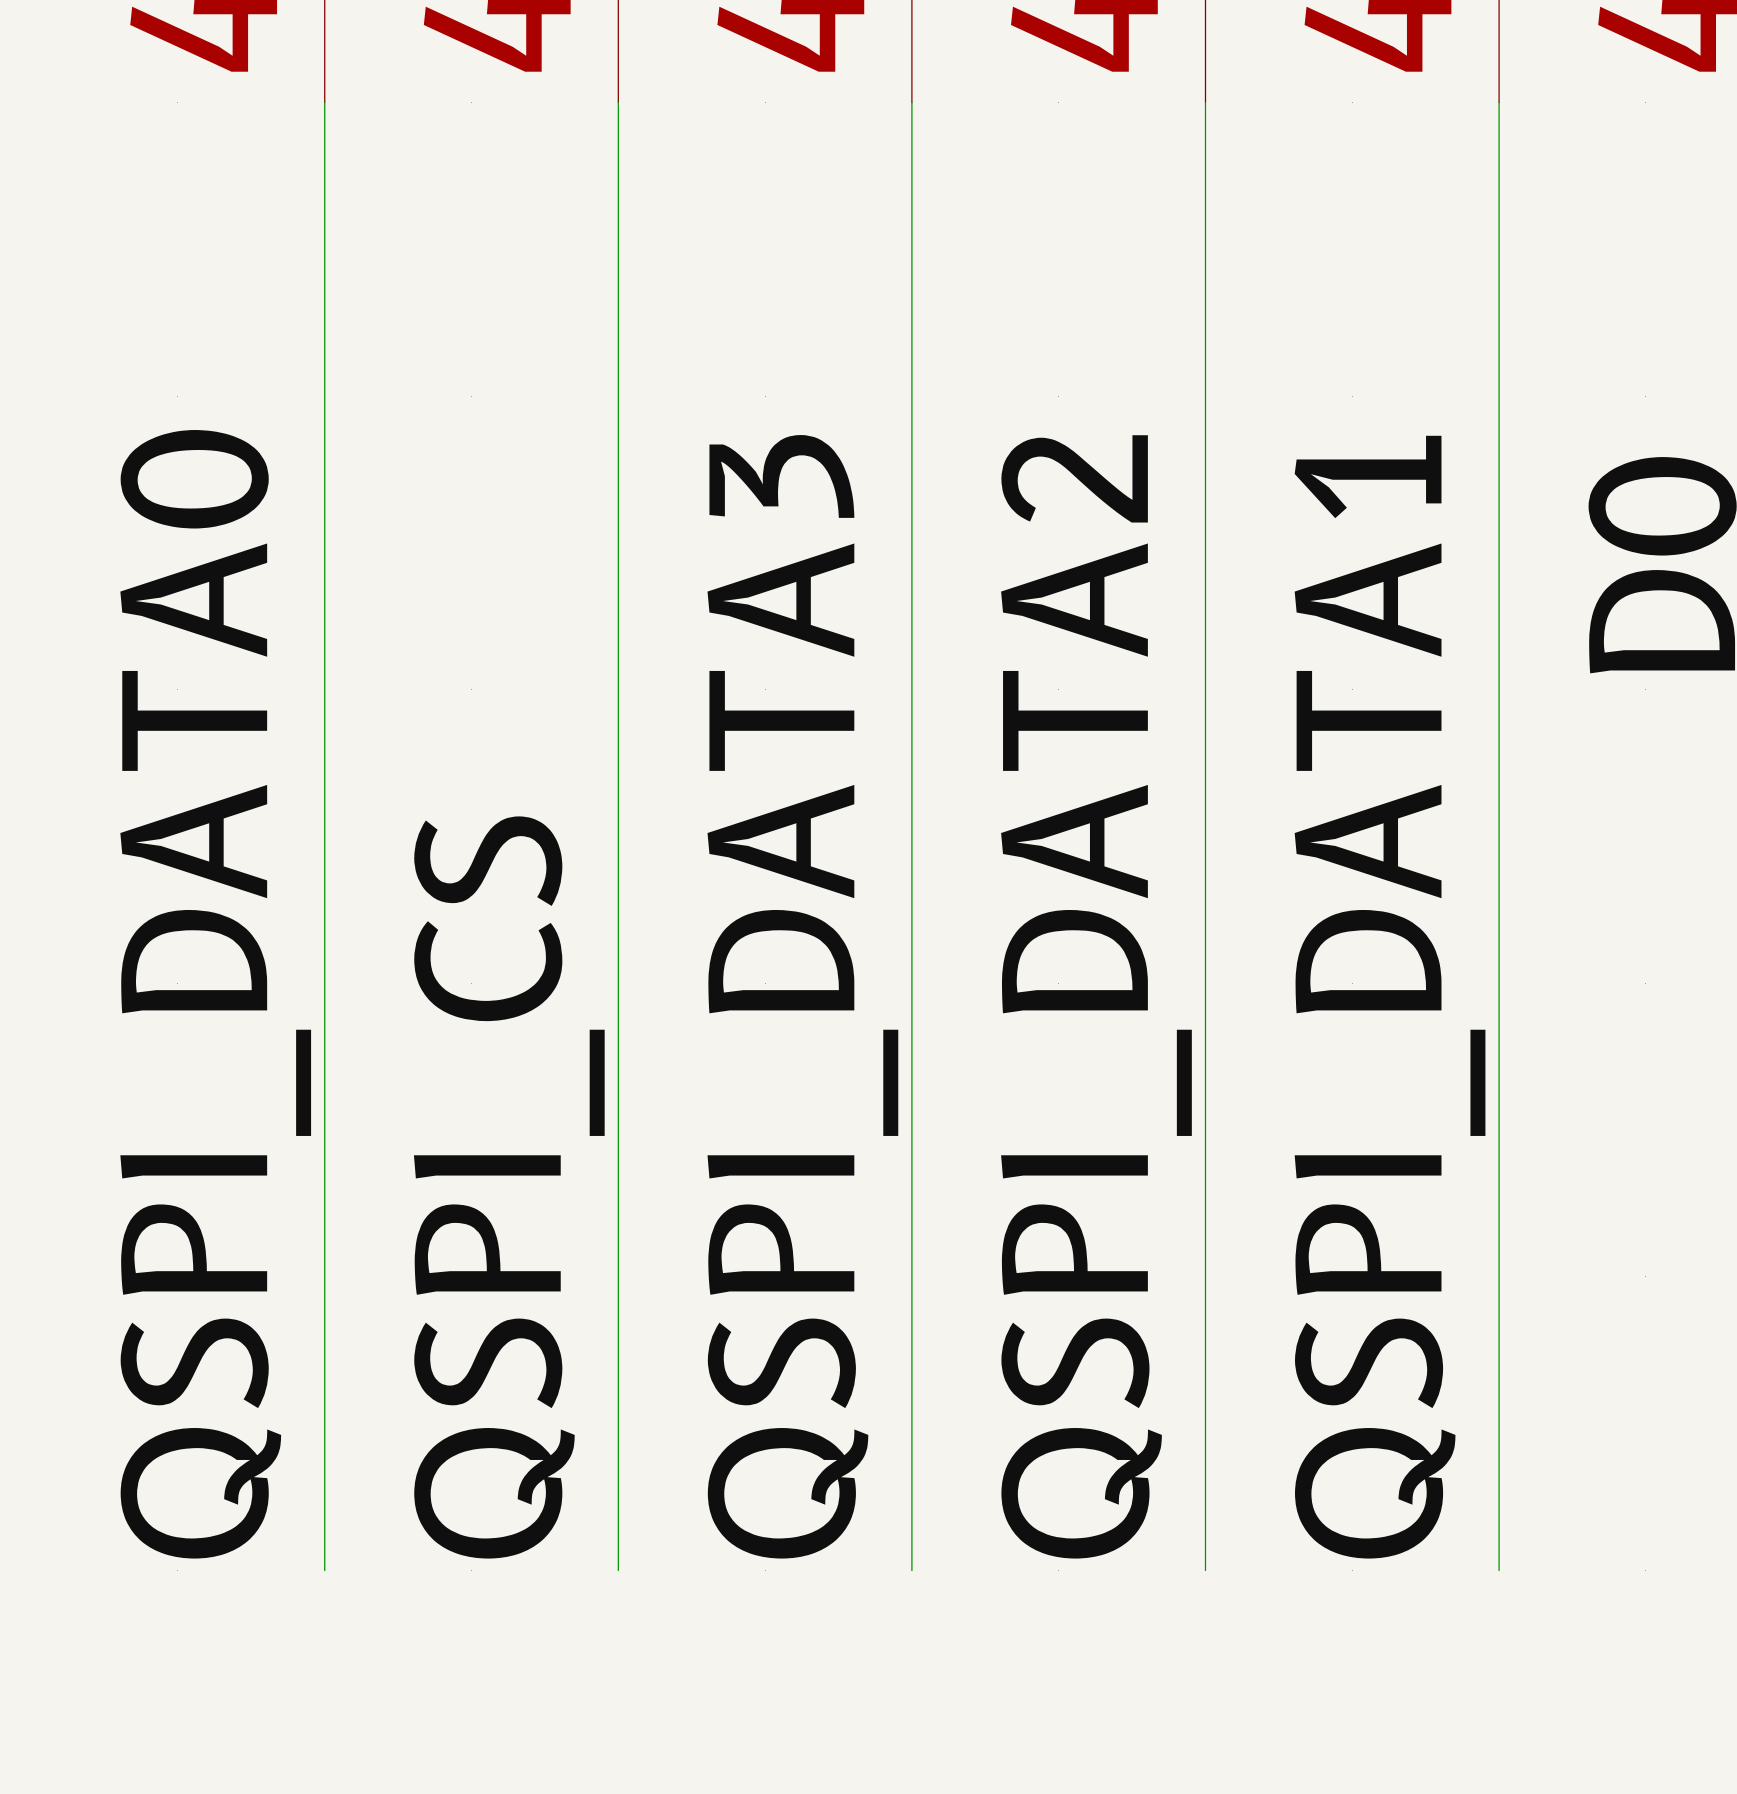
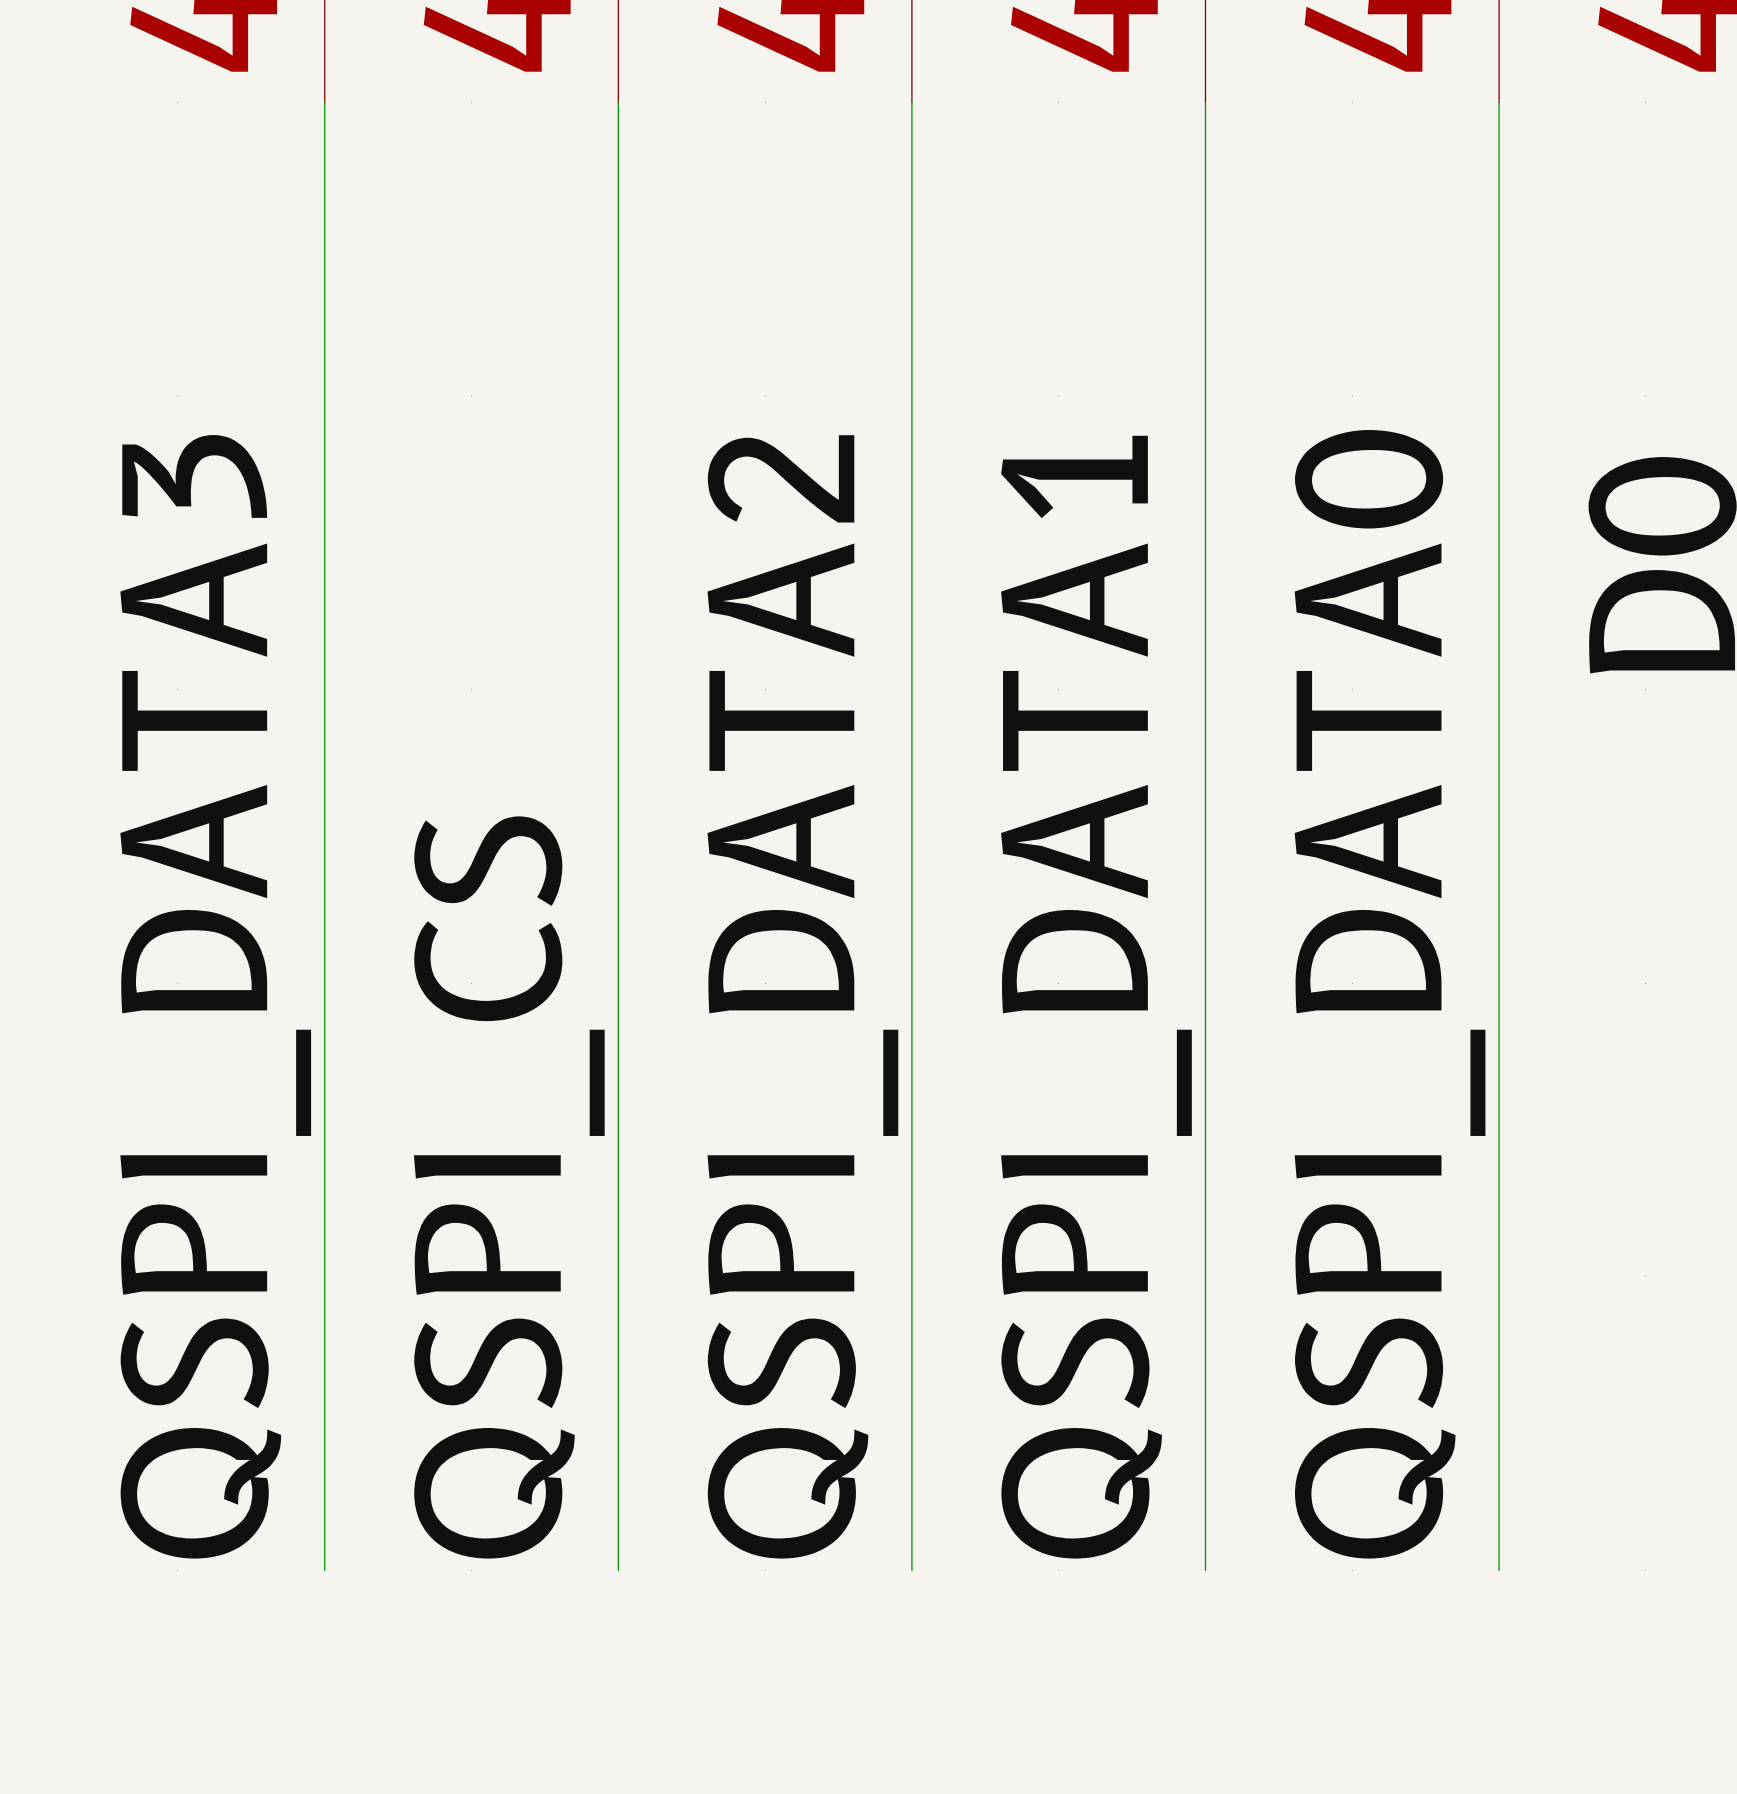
label: QSPI_DATA0 (215, 994) -> QSPI_DATA3 (215, 996)
label: QSPI_DATA3 (802, 996) -> QSPI_DATA2 (802, 996)
label: QSPI_DATA2 (1096, 996) -> QSPI_DATA1 (1096, 997)
label: QSPI_DATA1 (1390, 997) -> QSPI_DATA0 (1390, 994)

